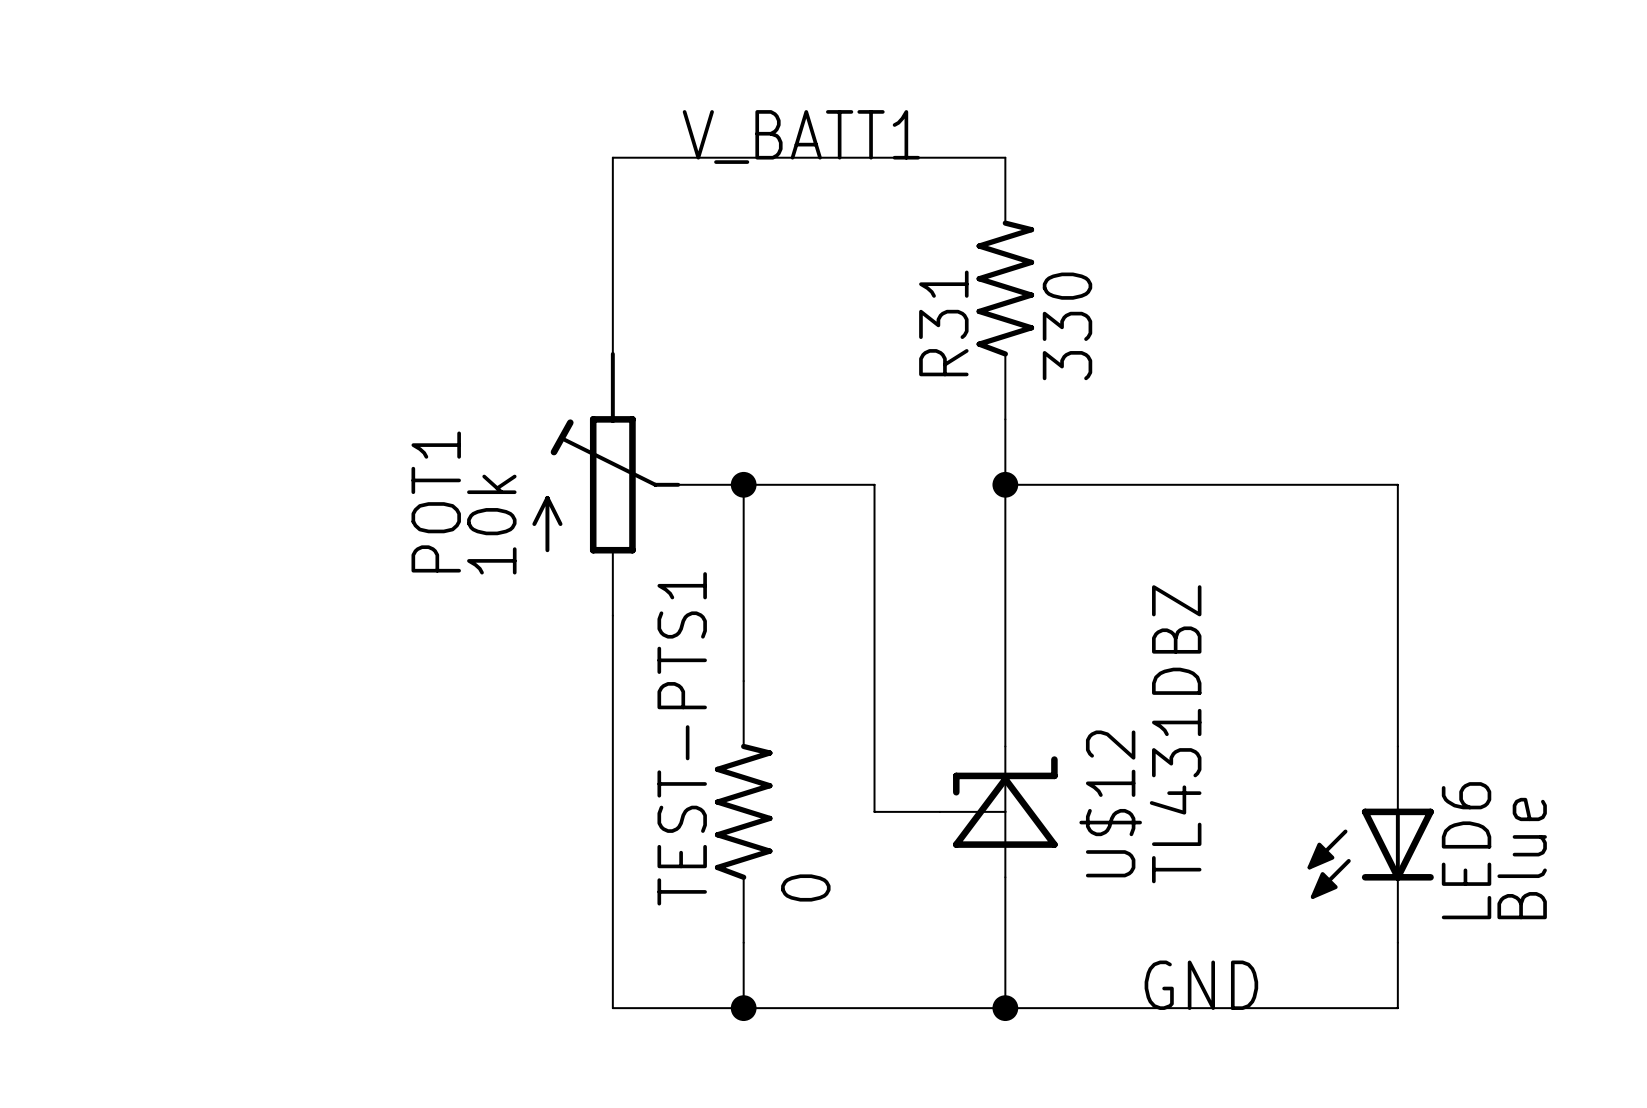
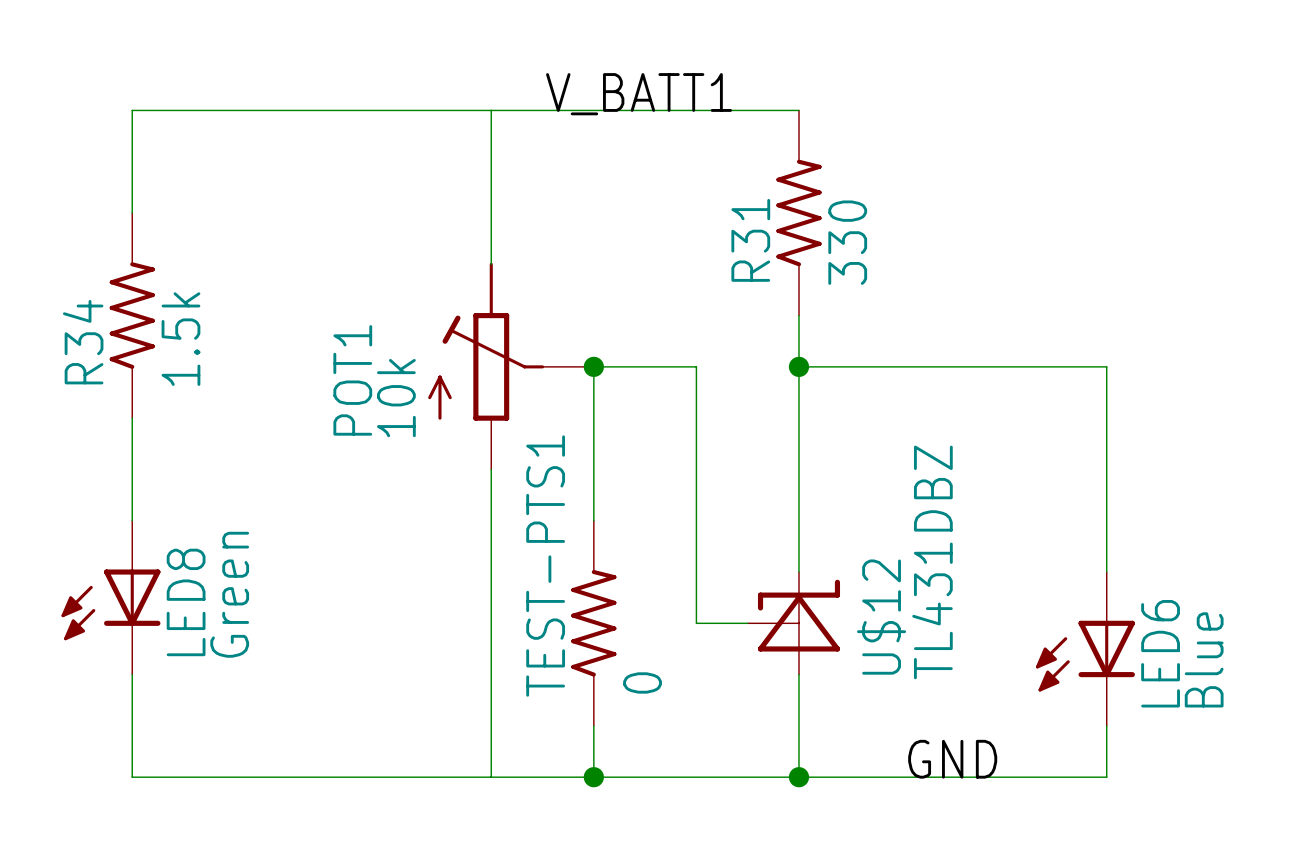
wire: none -> (491, 110) (132, 110) (132, 213)
R34: none -> 1.5k (132, 315)
wire: none -> (132, 418) (132, 520)
LED8: none -> Green (110, 597)
wire: none -> (132, 674) (132, 777) (491, 777)

